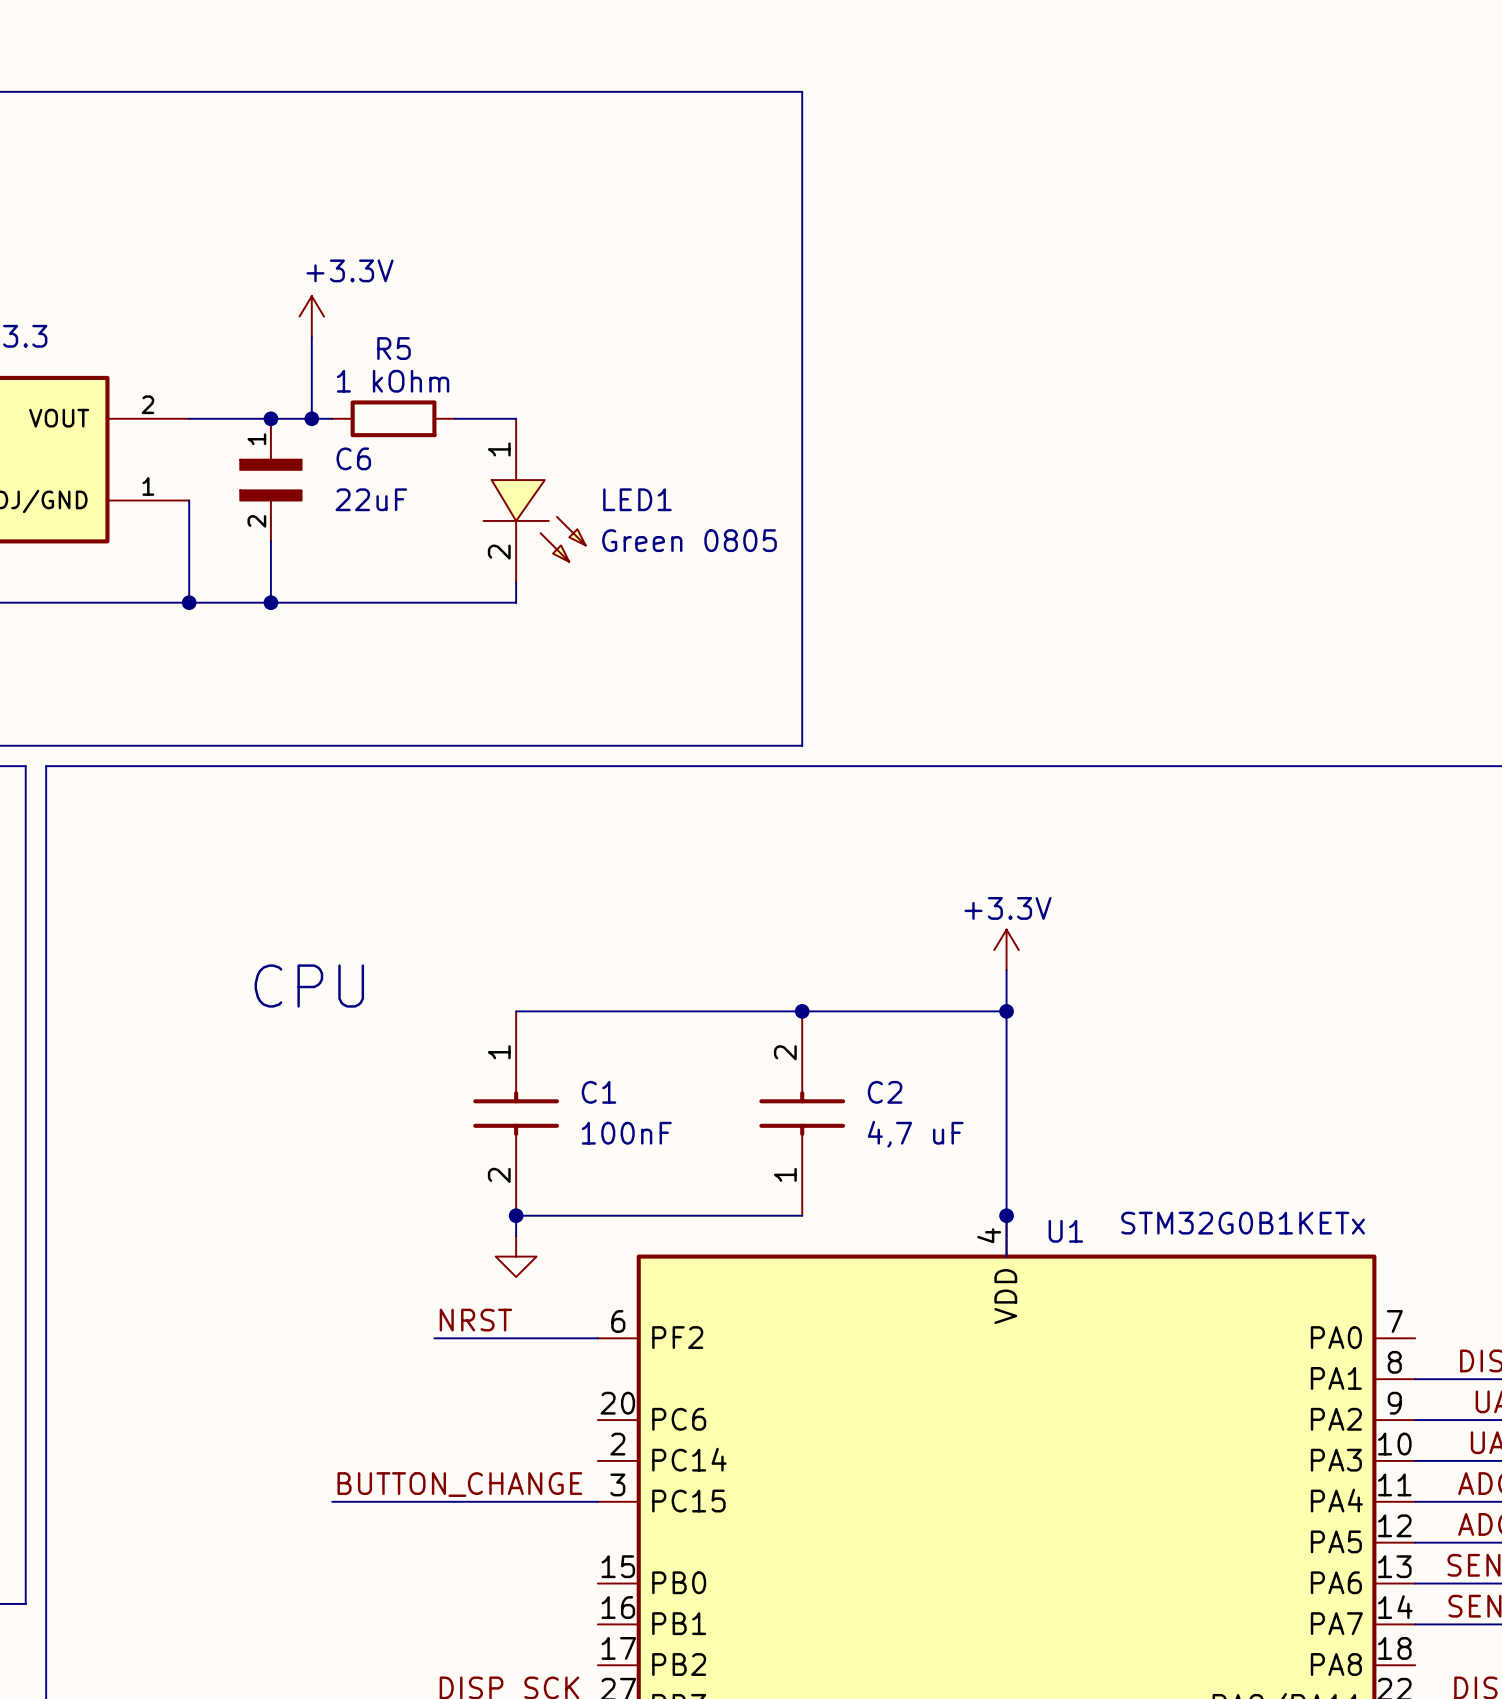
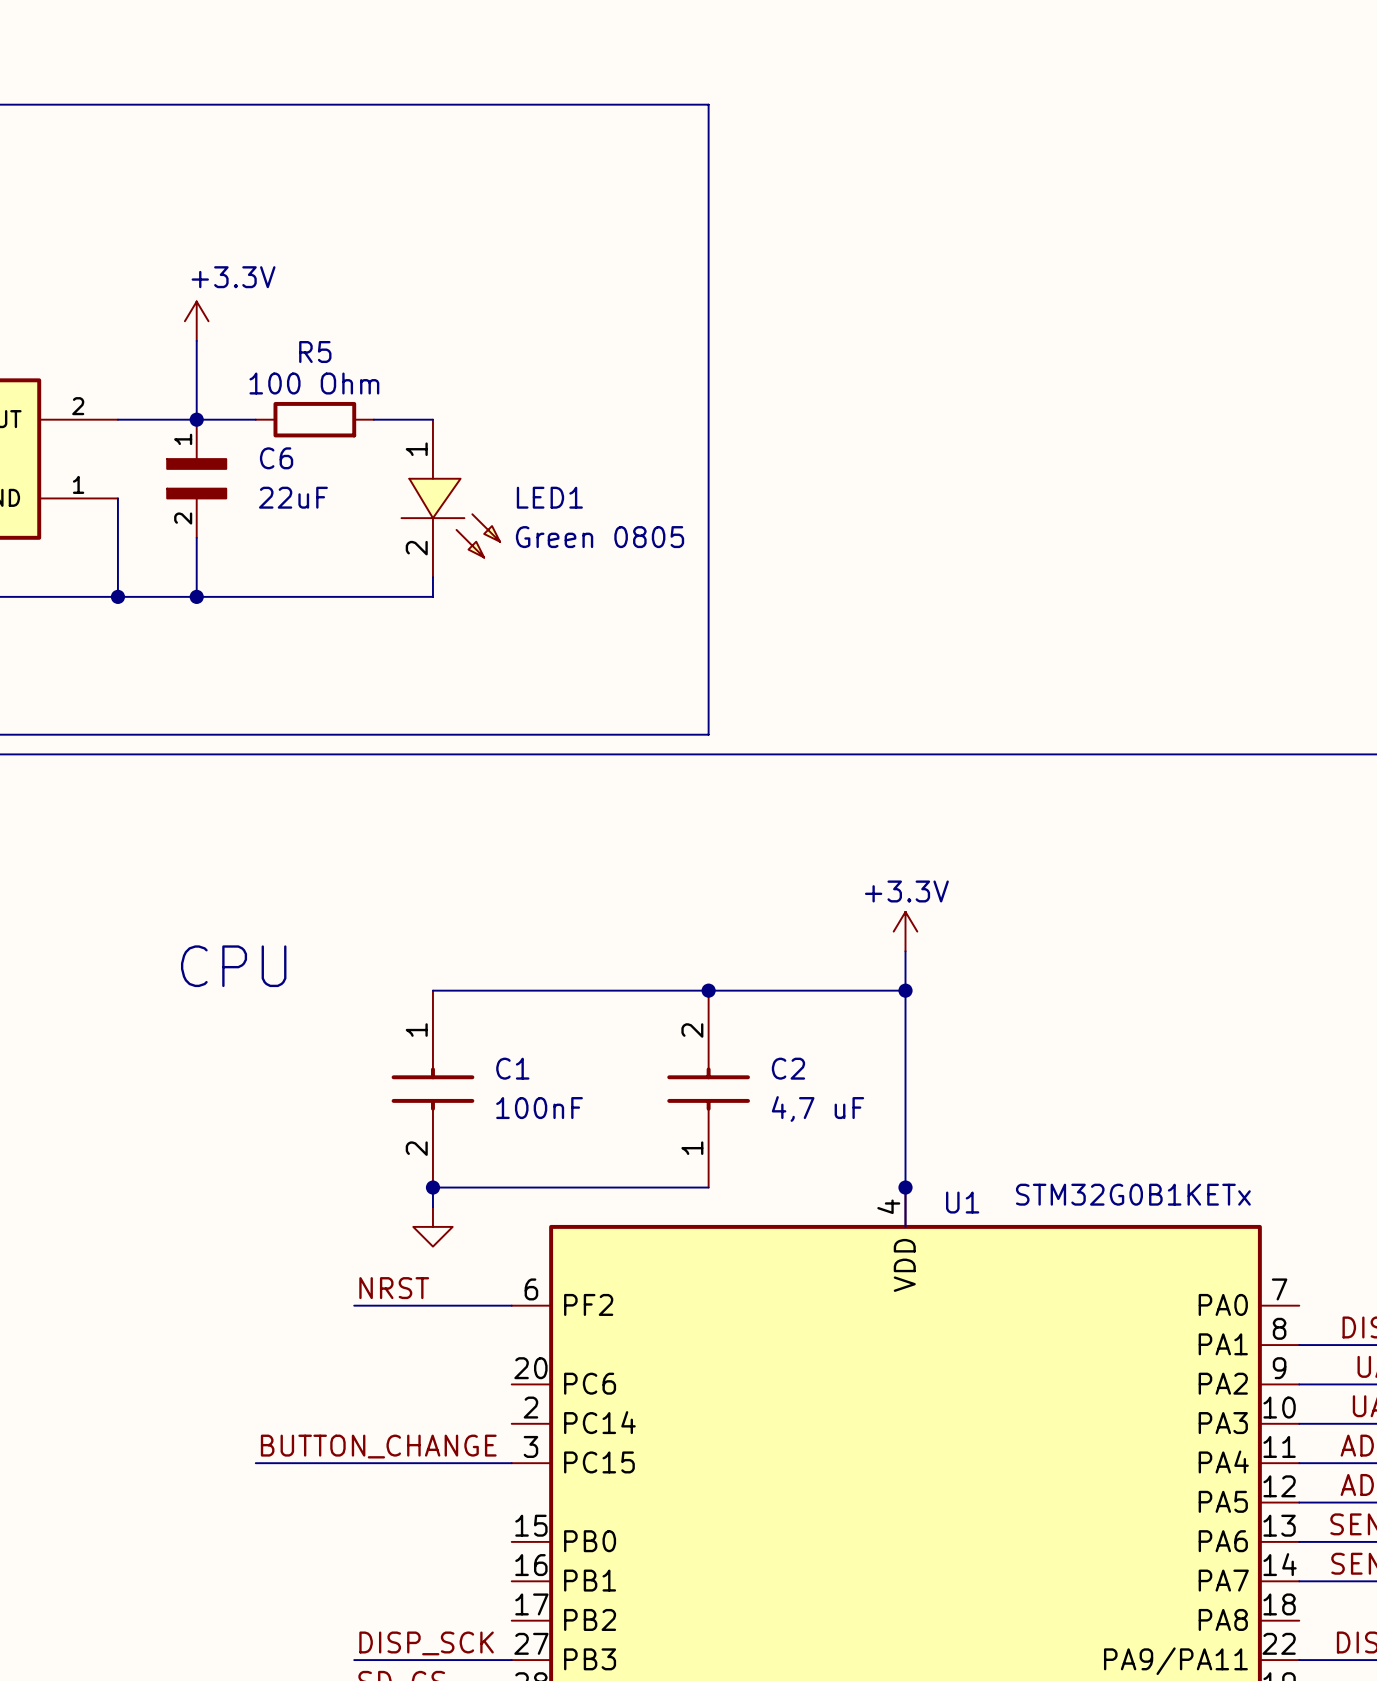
power symbol position: +3.3V (311, 316) -> +3.3V (196, 321)
wire: (311, 337) (311, 418) -> (196, 340) (196, 419)
R5 value: 1 kOhm (393, 381) -> 100 Ohm (314, 383)
junction: (311, 418) -> none

